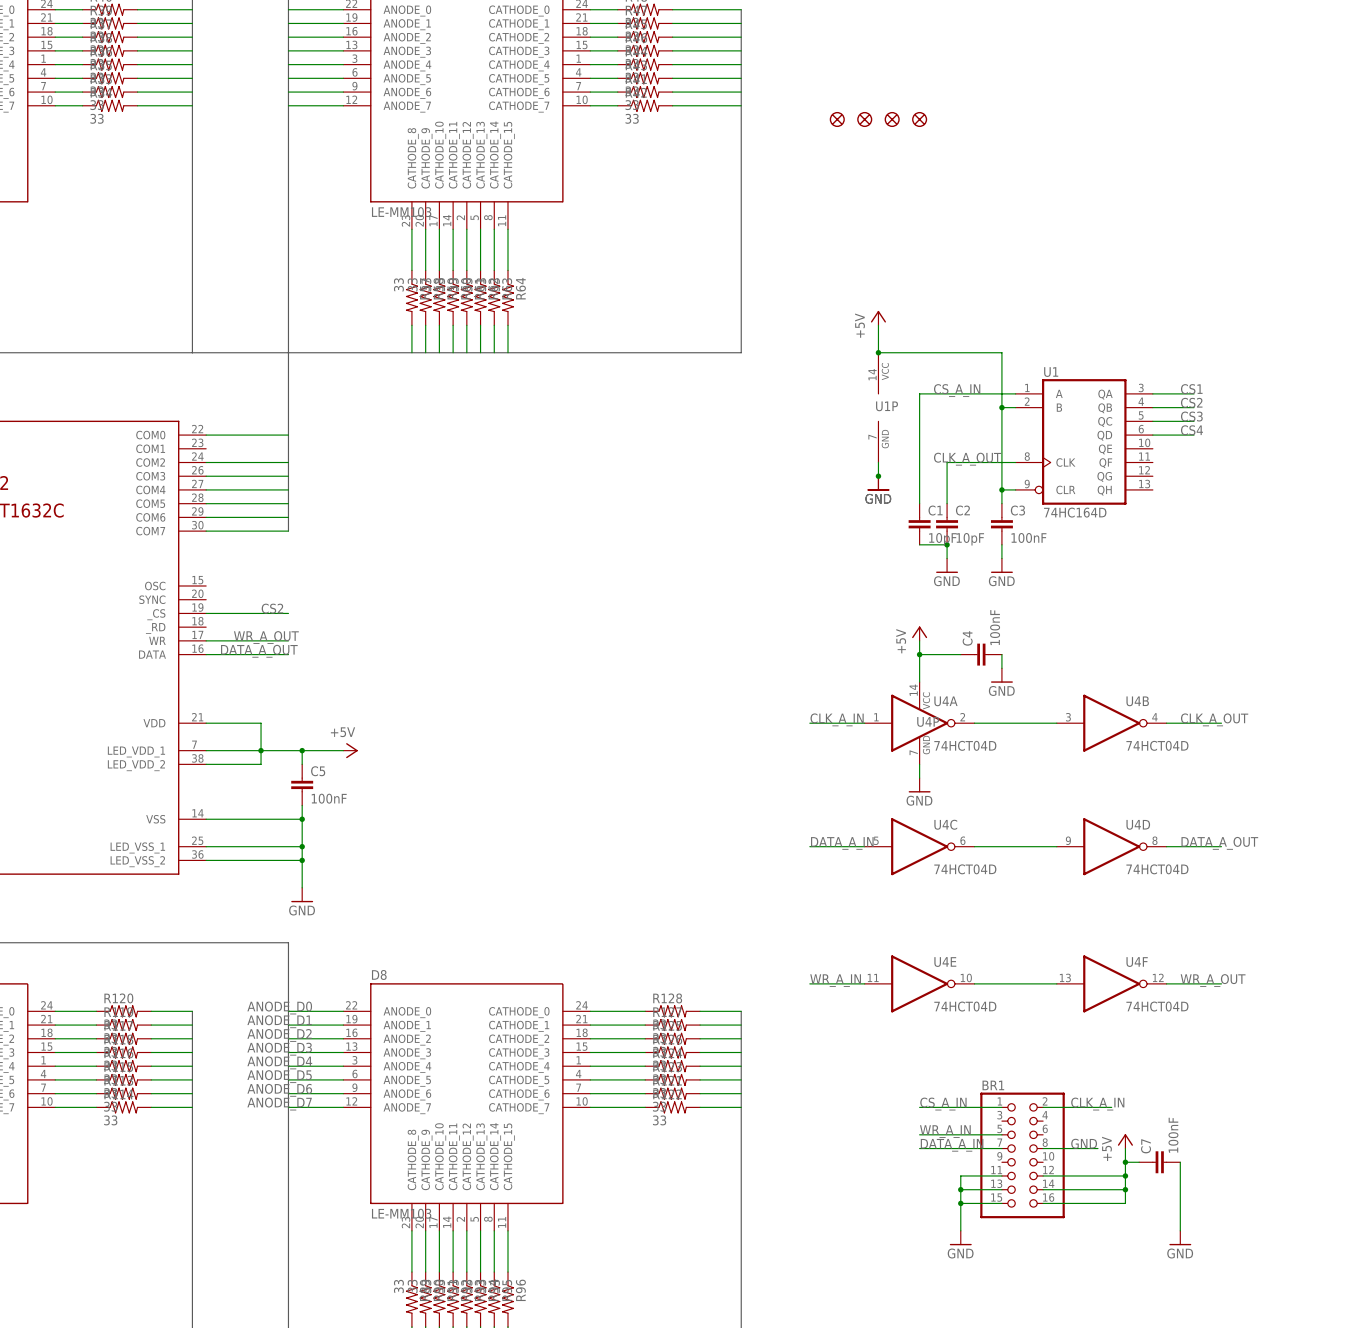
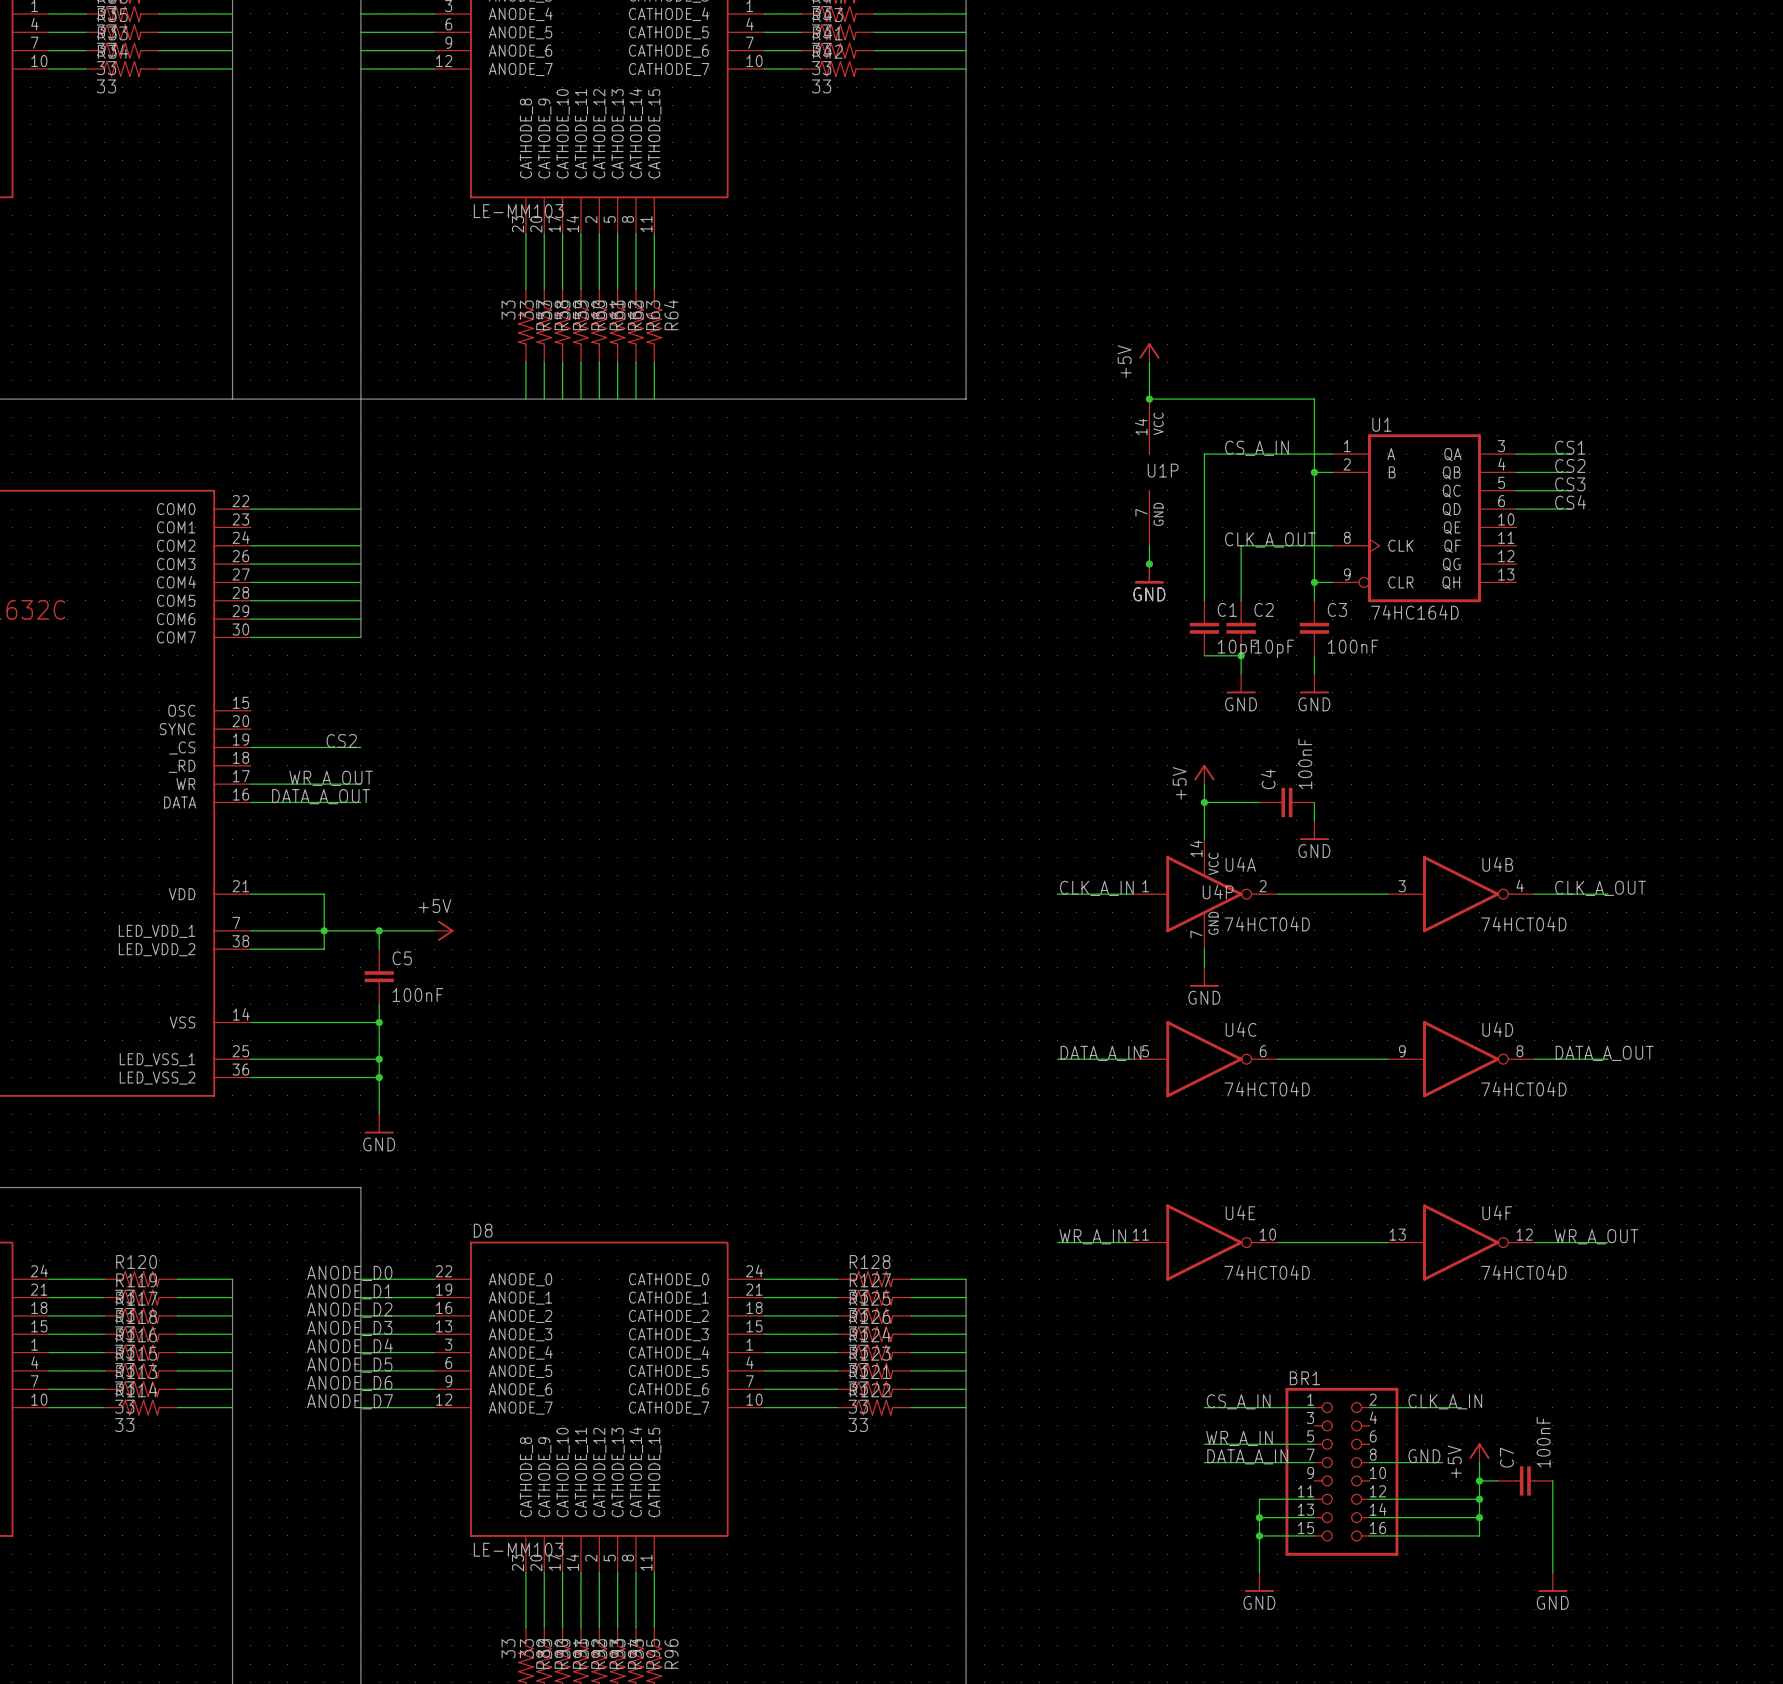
part: (837, 119) -> none
part: (864, 119) -> none
part: (892, 119) -> none
part: (919, 119) -> none

